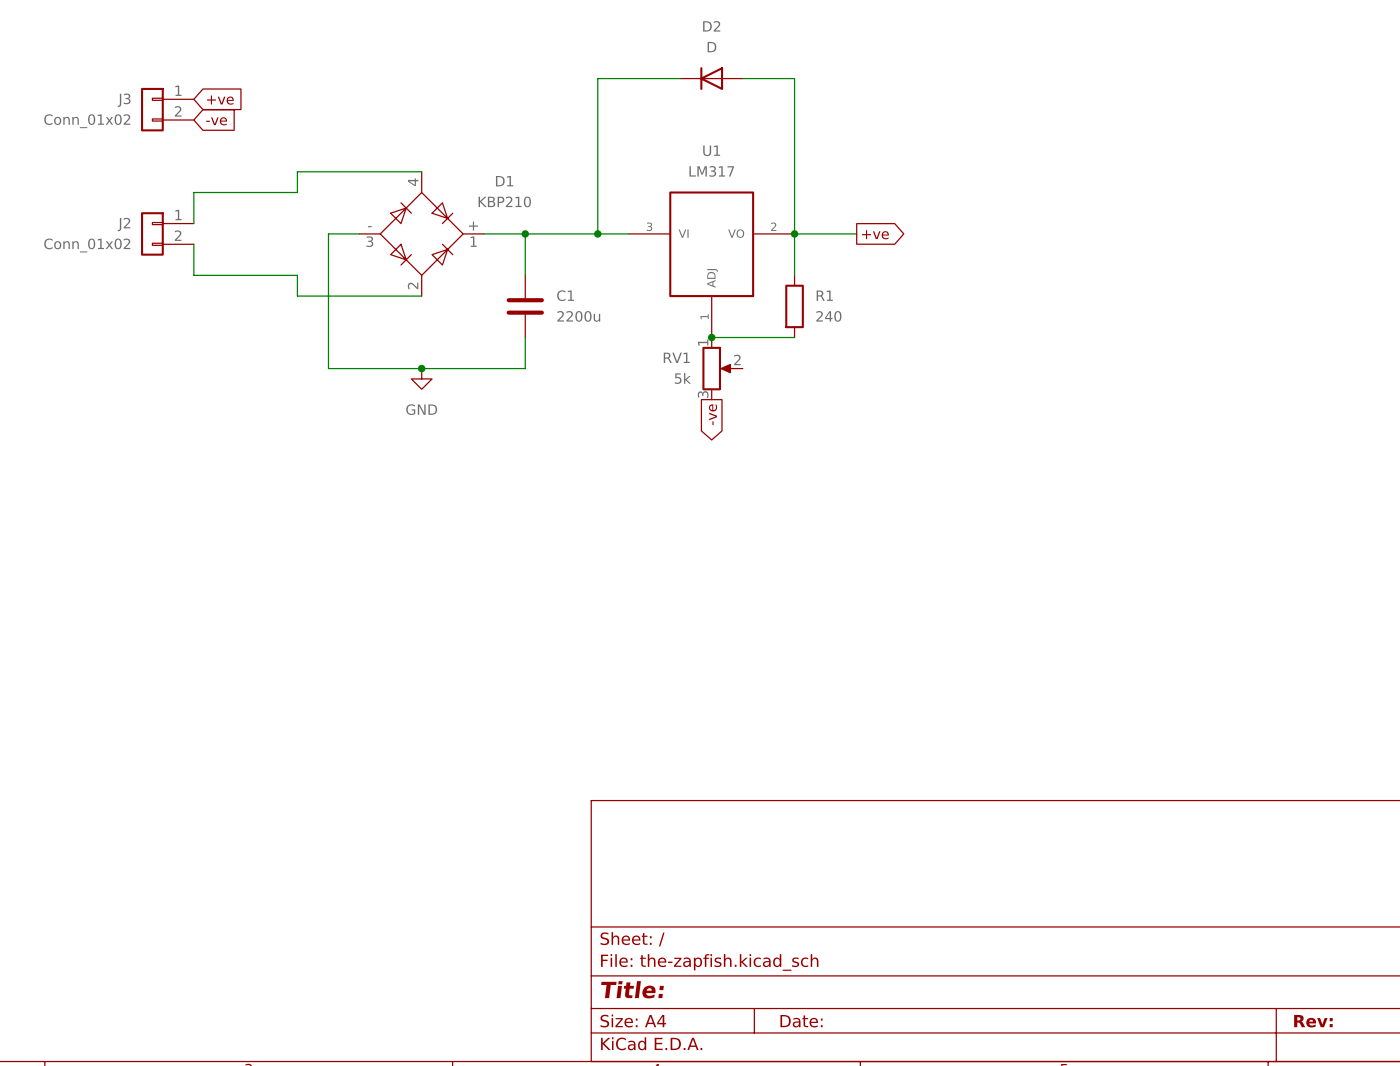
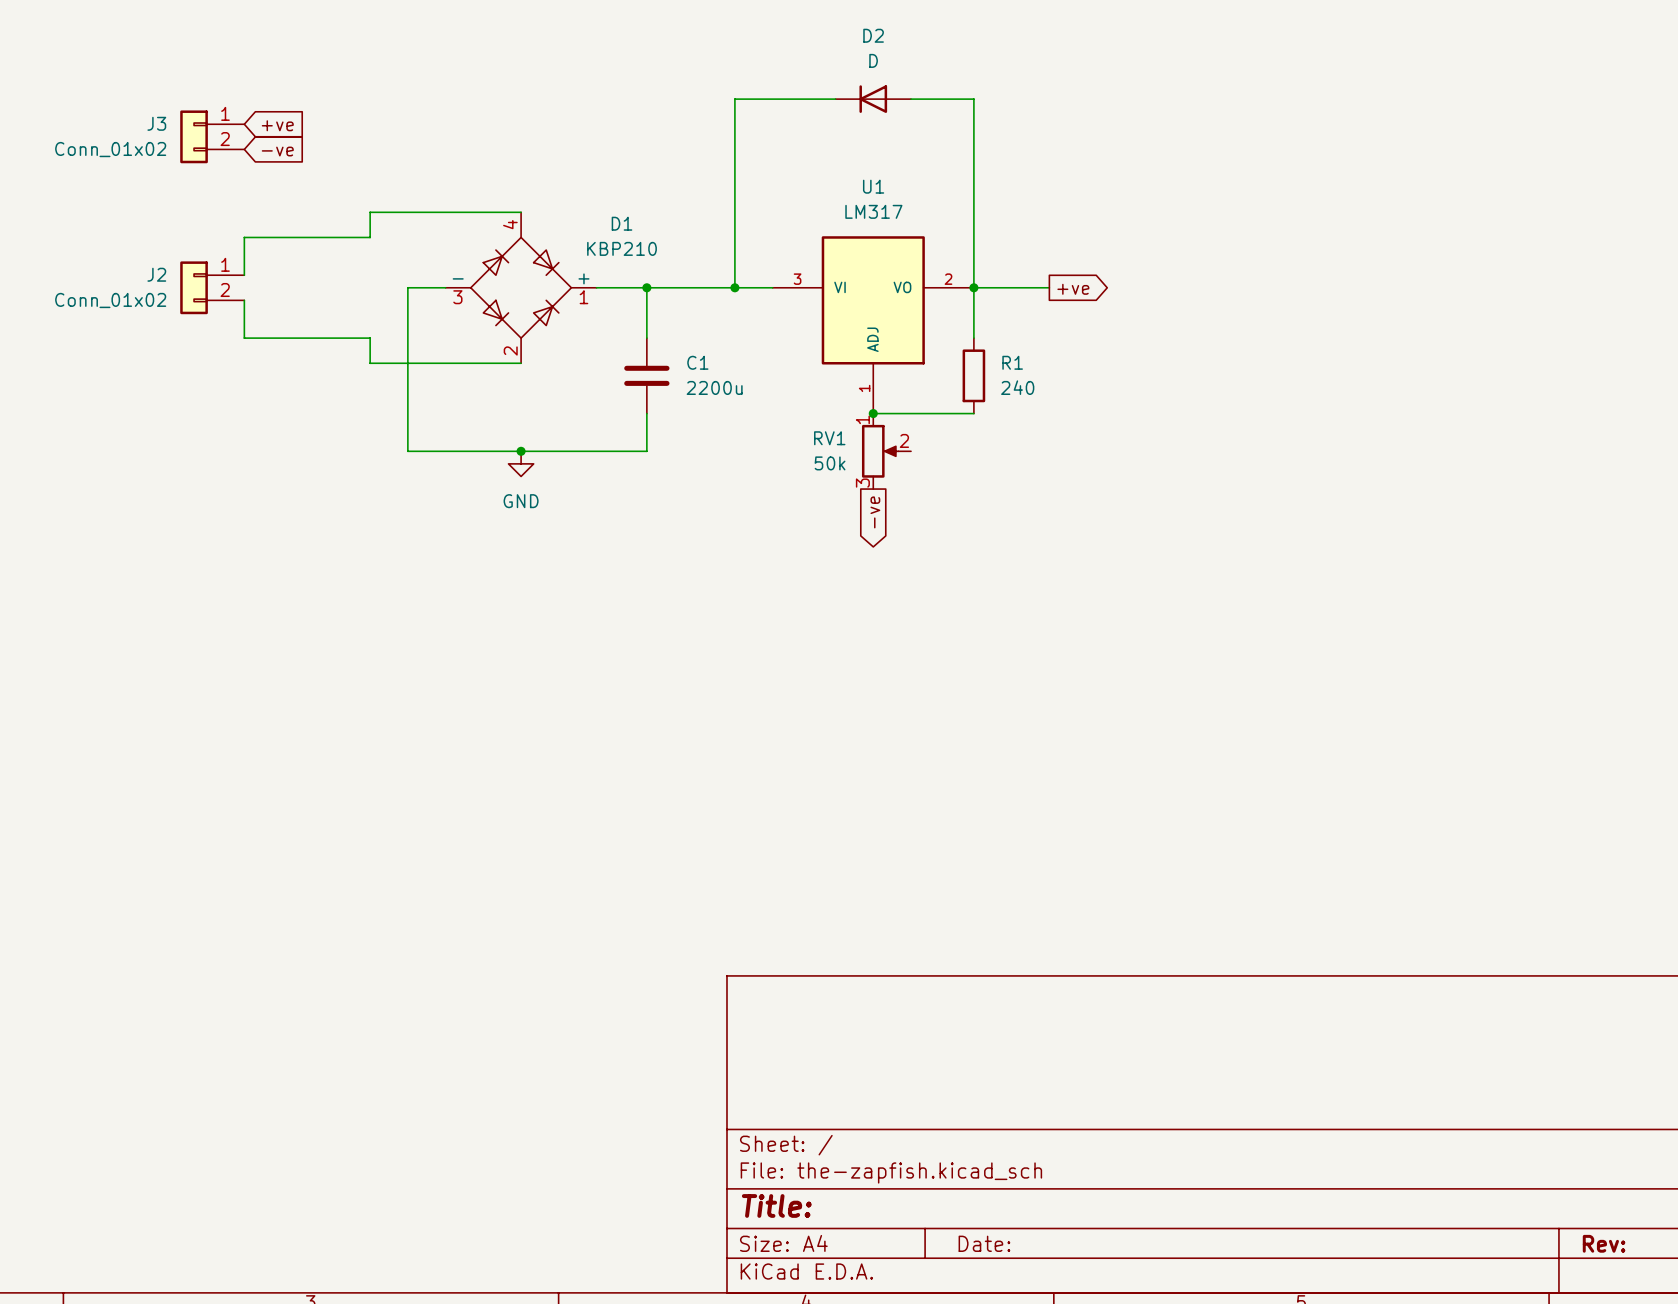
RV1 value: 5k (682, 378) -> 50k (830, 463)

